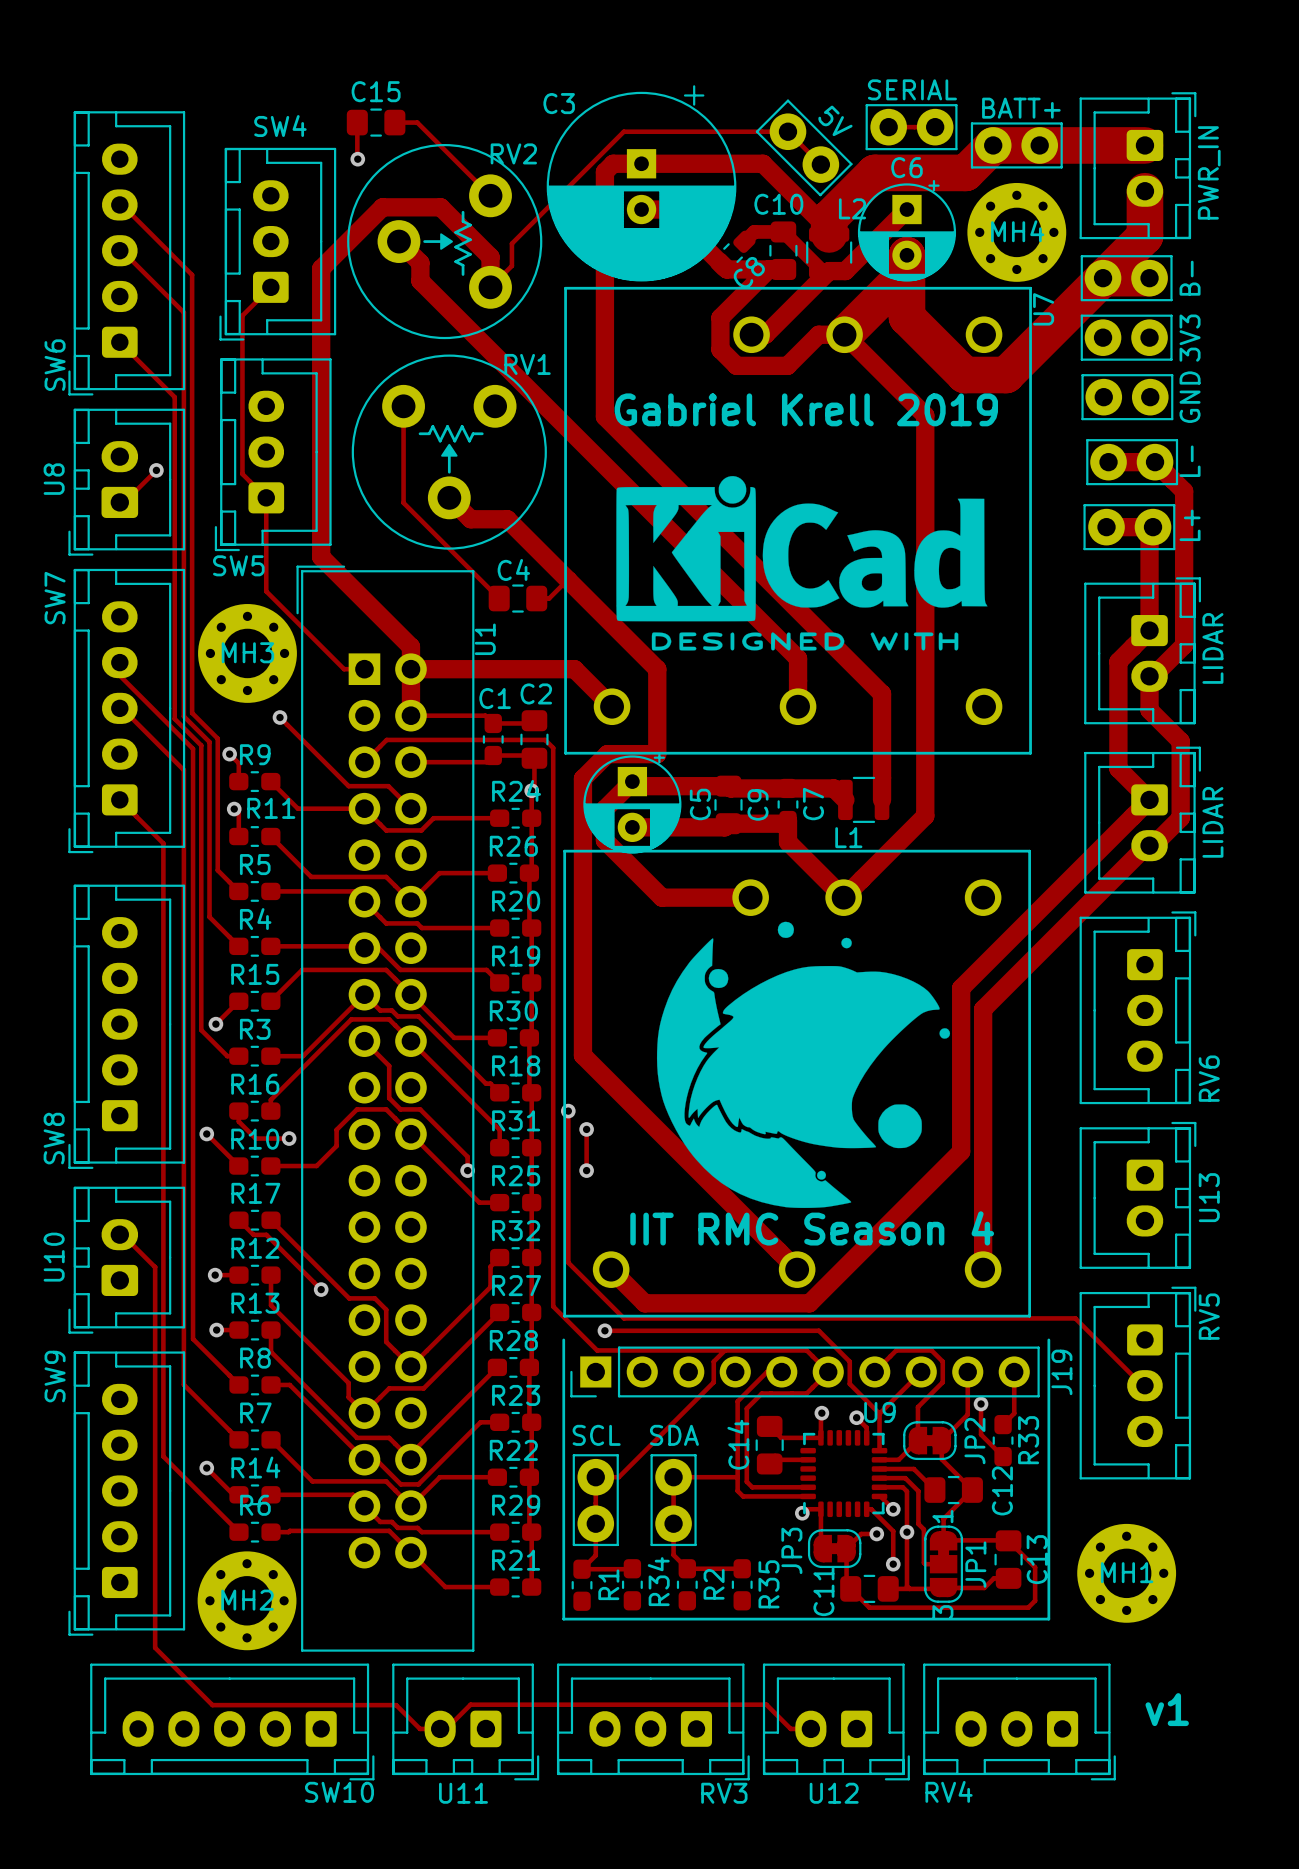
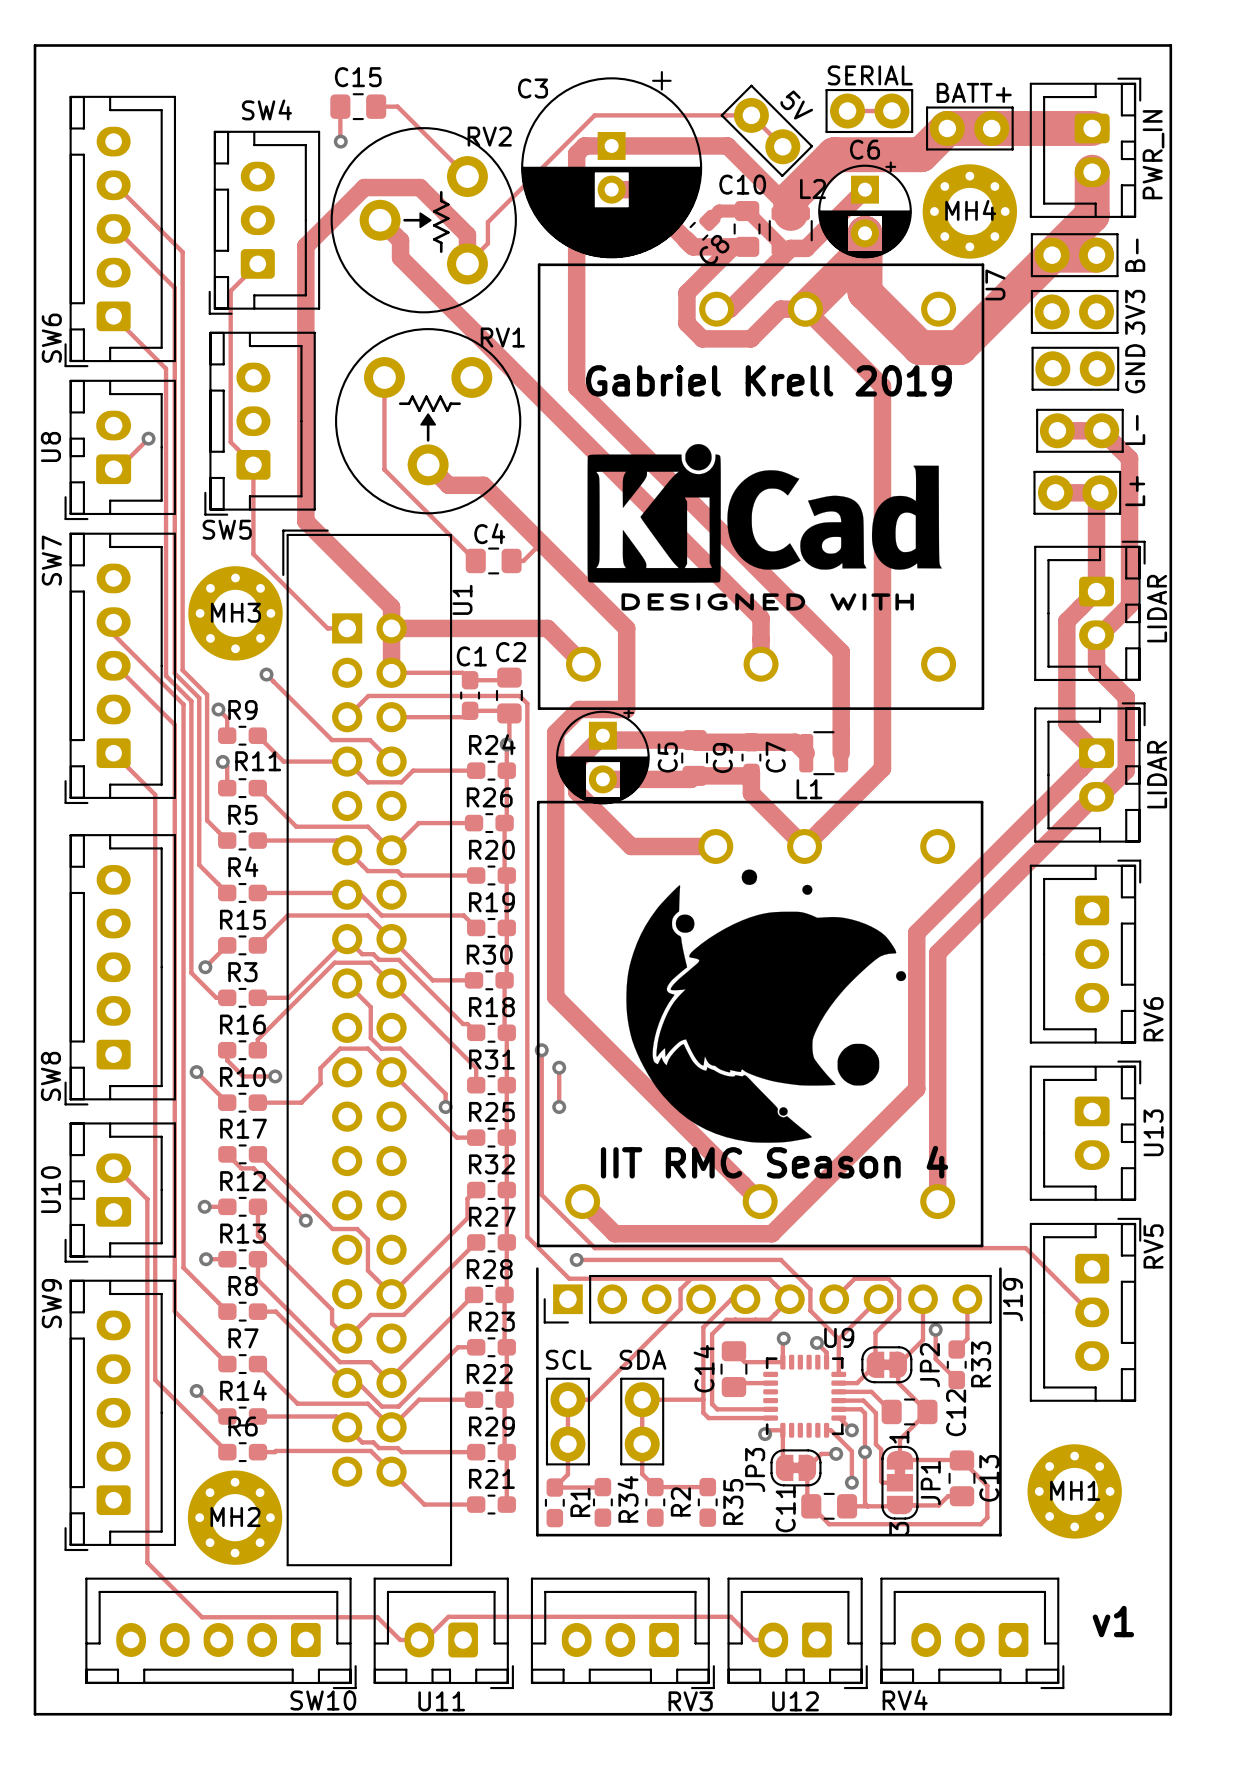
board edge: none -> (34, 45) (34, 1714) (1170, 1714) (1170, 45) (34, 45)

